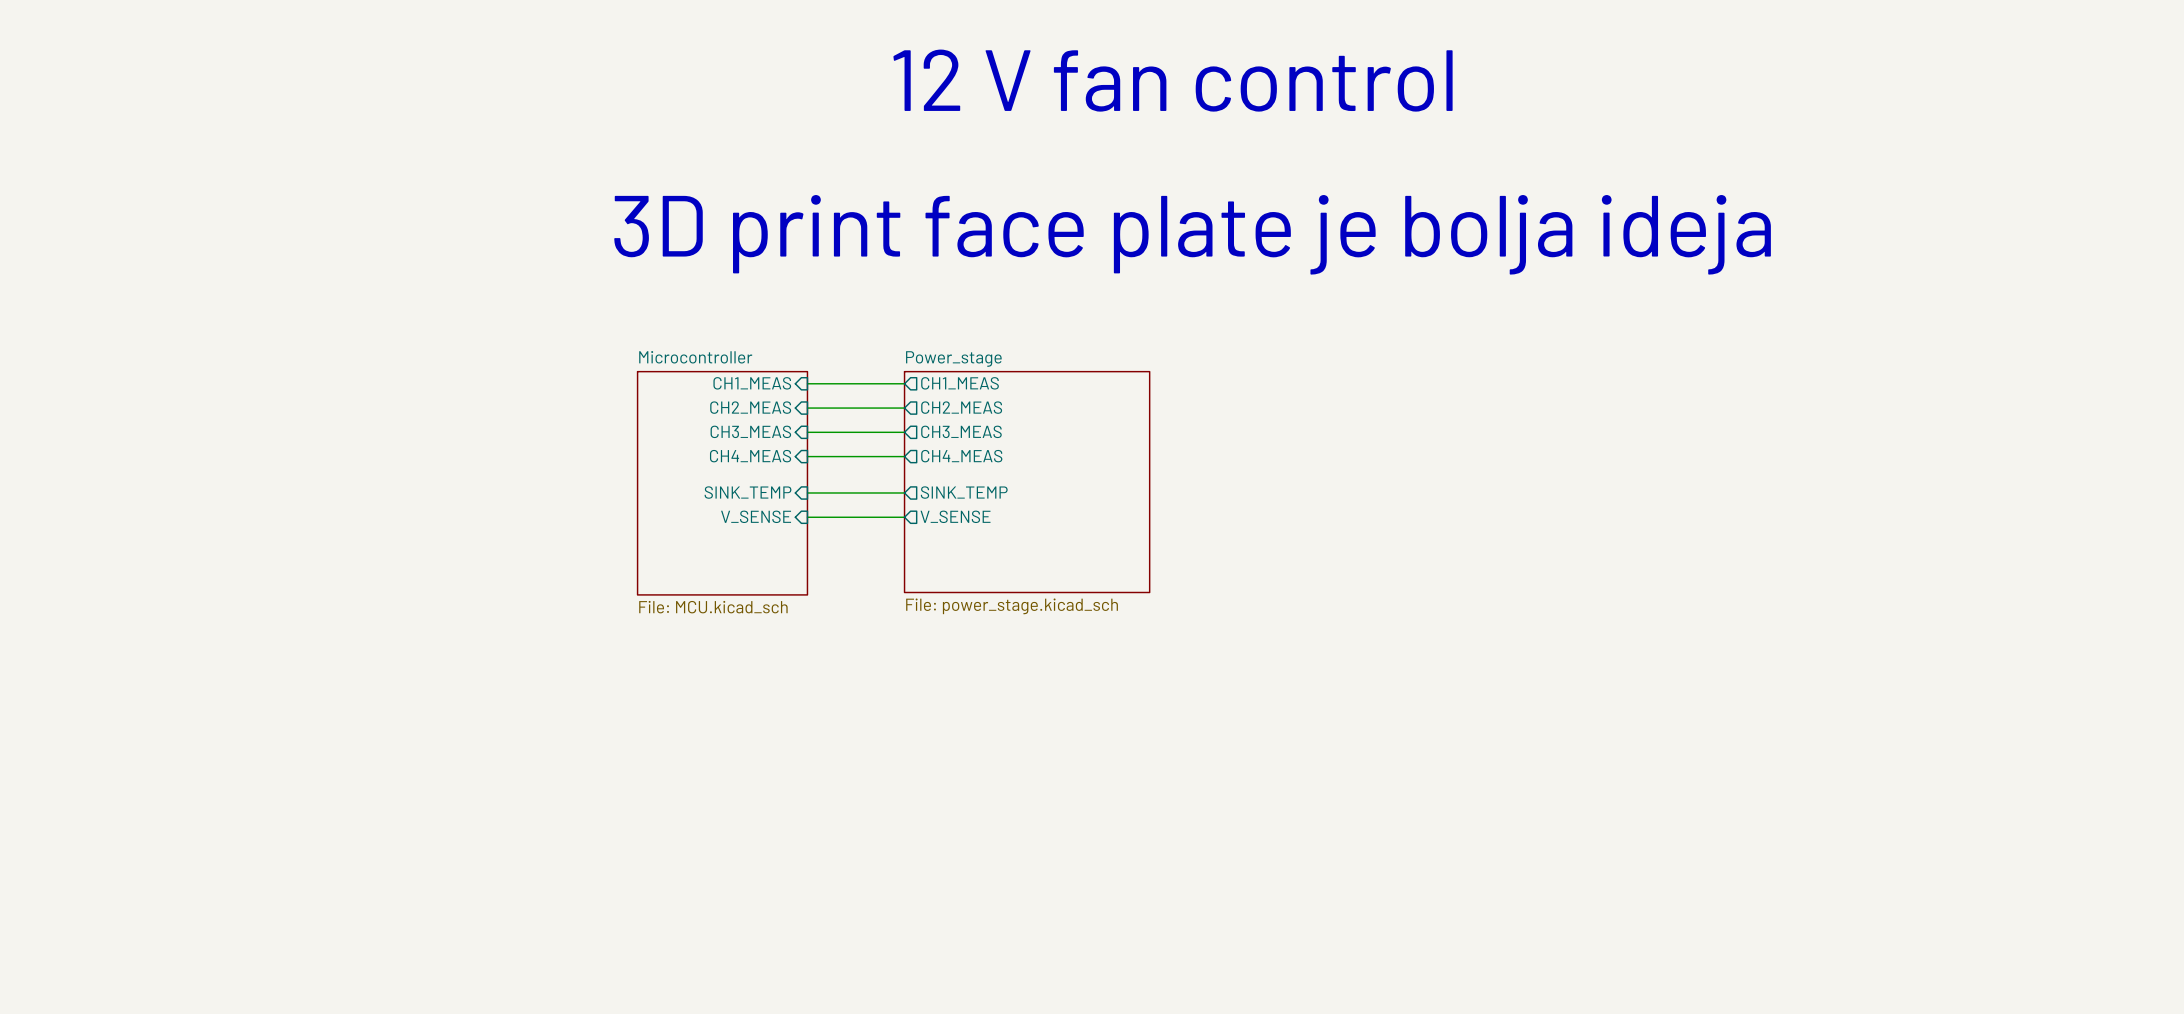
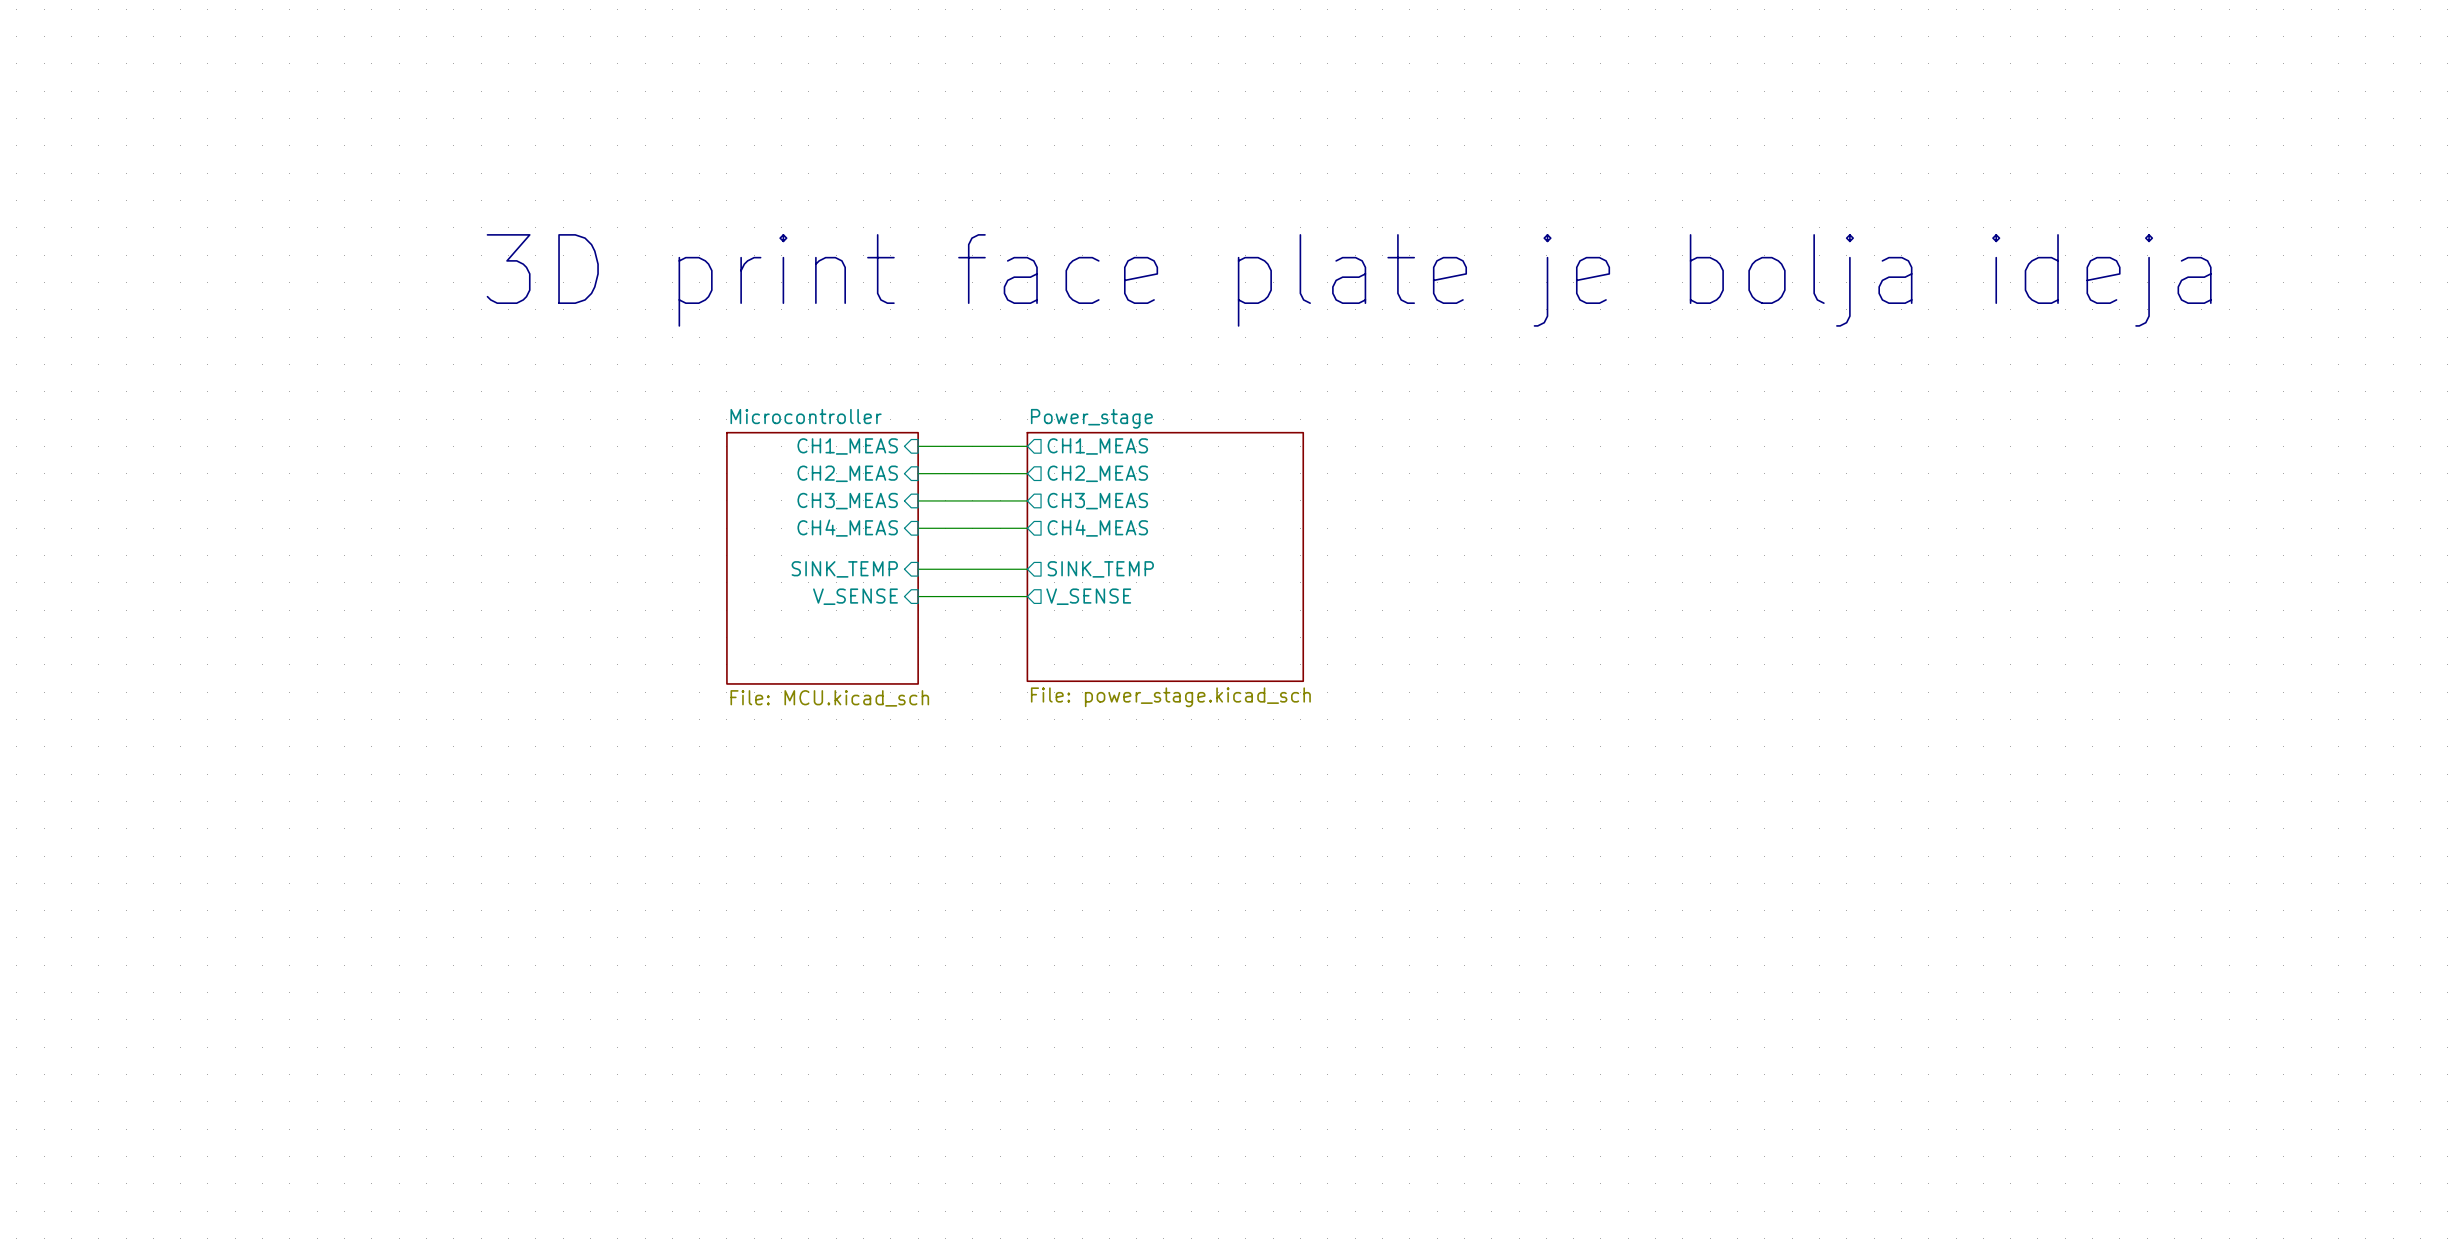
text: 12 V fan control (1173, 80) -> none

